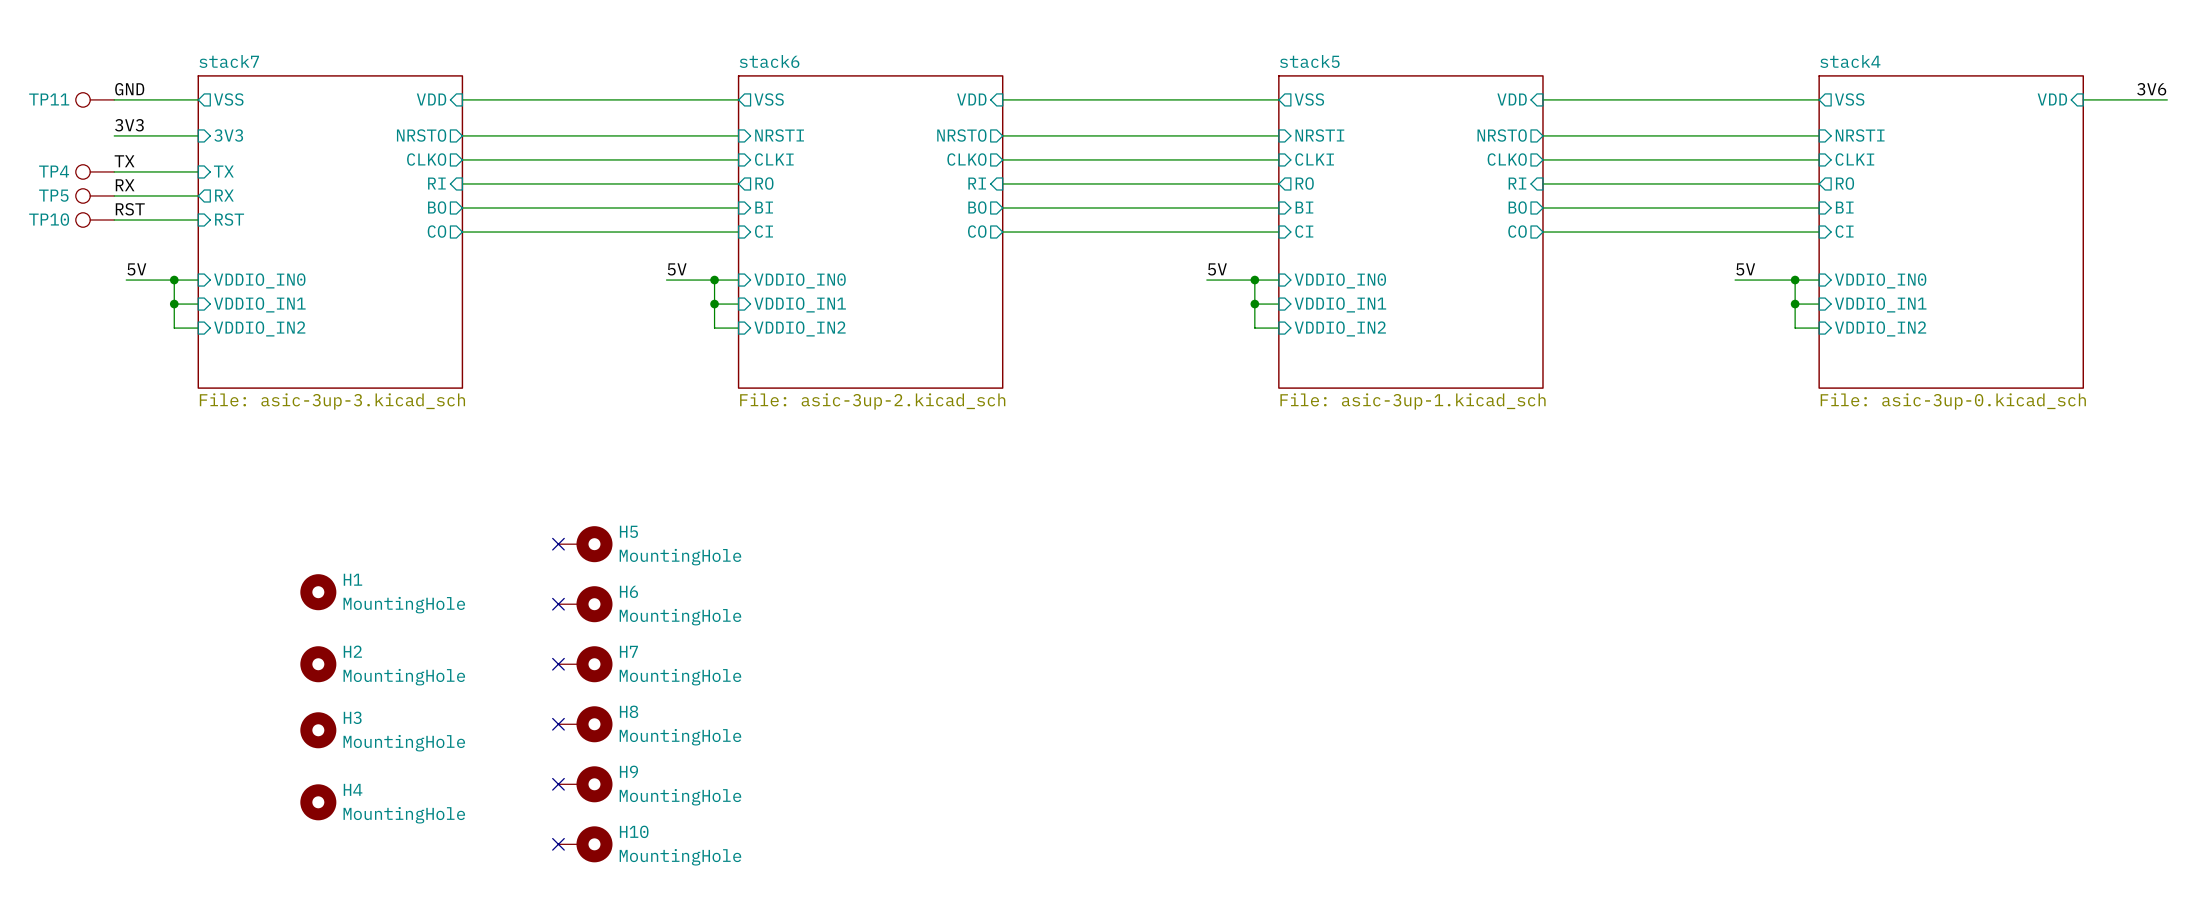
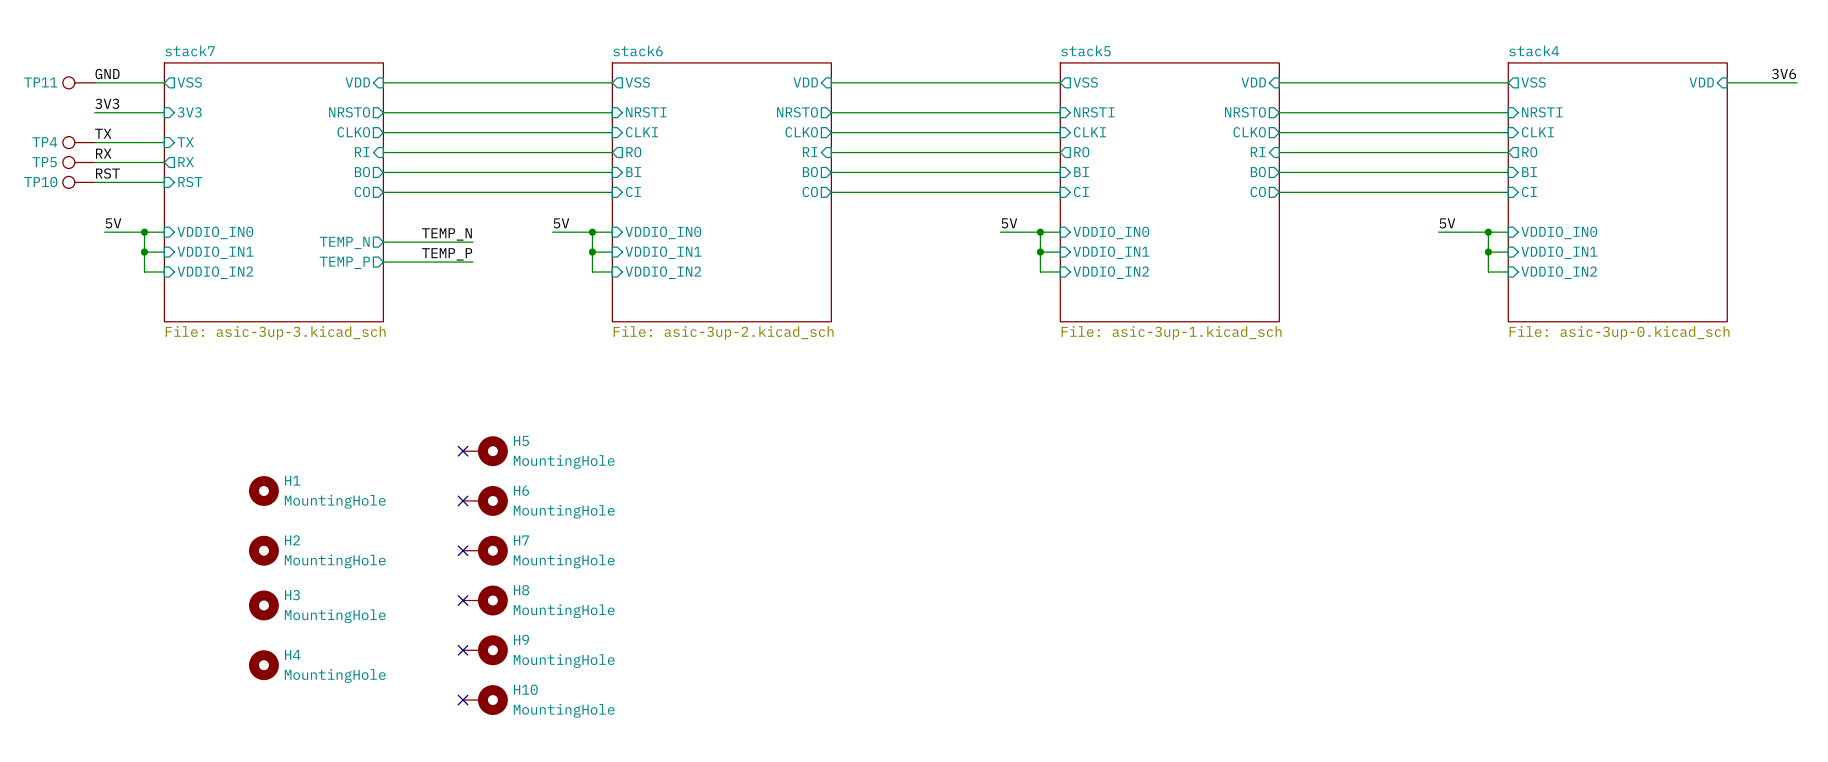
label: none -> TEMP_N (446, 234)
wire: none -> (383, 242) (472, 242)
sheet pin: none -> TEMP_N (344, 242)
label: none -> TEMP_P (447, 254)
wire: none -> (383, 262) (472, 262)
sheet pin: none -> TEMP_P (344, 262)

